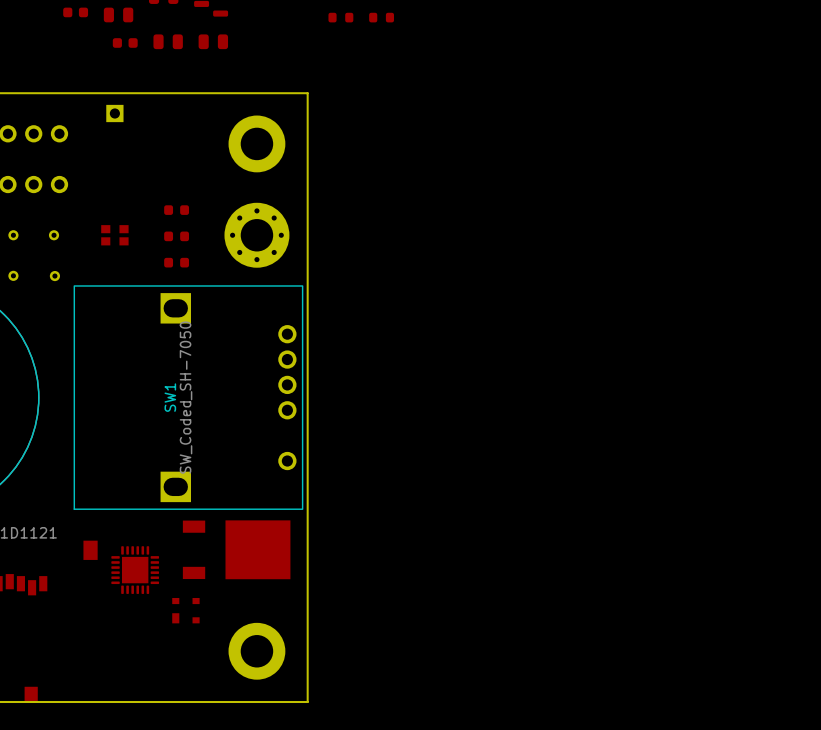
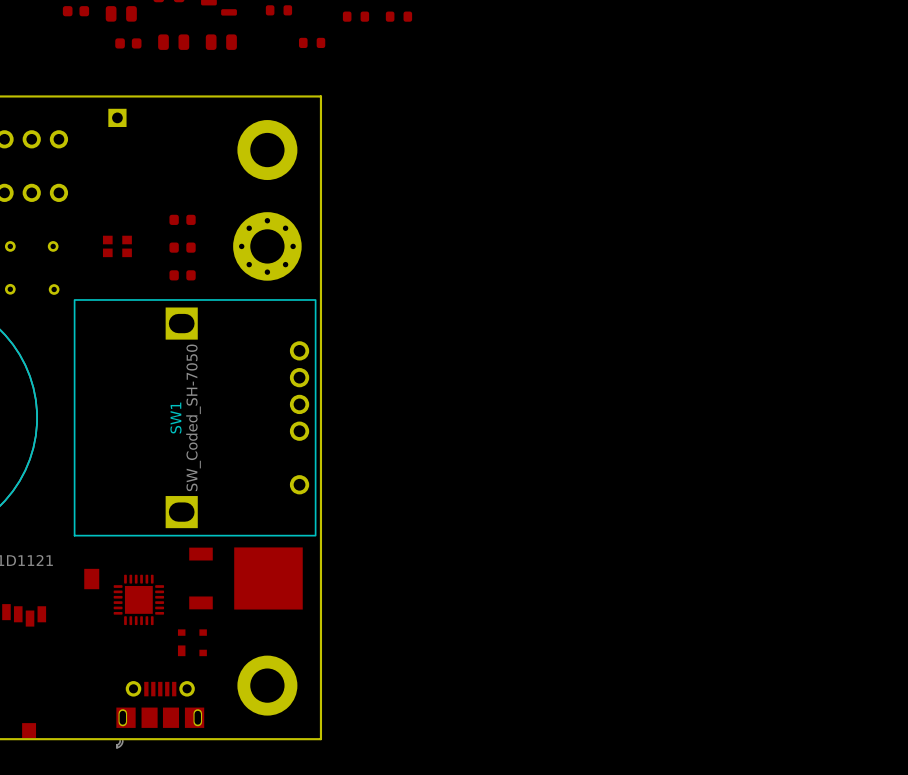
part: none -> (278, 10)
part: none -> (312, 42)
part: none -> (160, 714)

